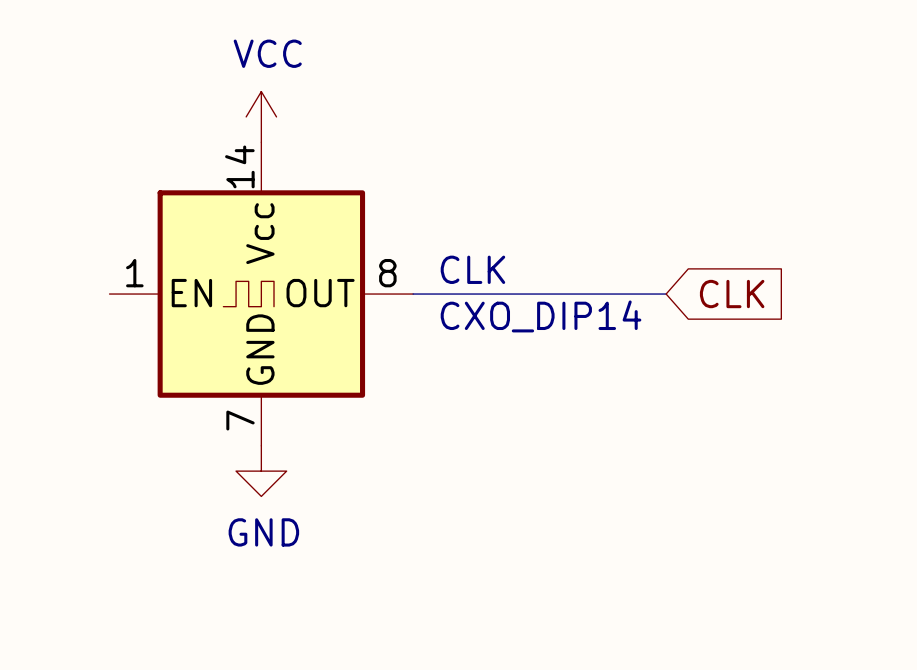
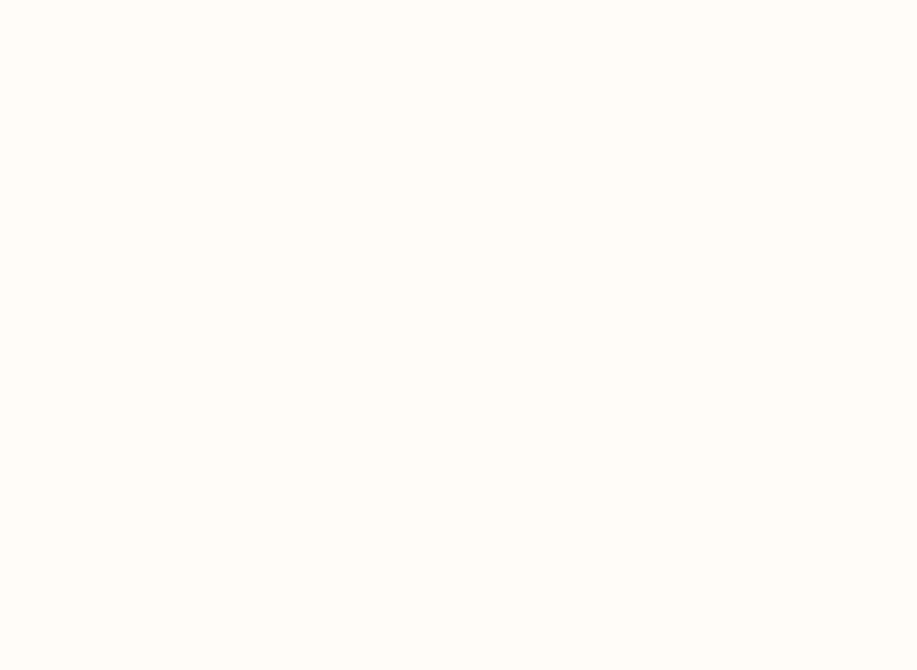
power symbol: VCC (261, 116) -> none
CLK: CXO_DIP14 (261, 294) -> none
wire: (413, 294) (666, 294) -> none
global label: CLK (732, 294) -> none
power symbol: GND (261, 471) -> none

